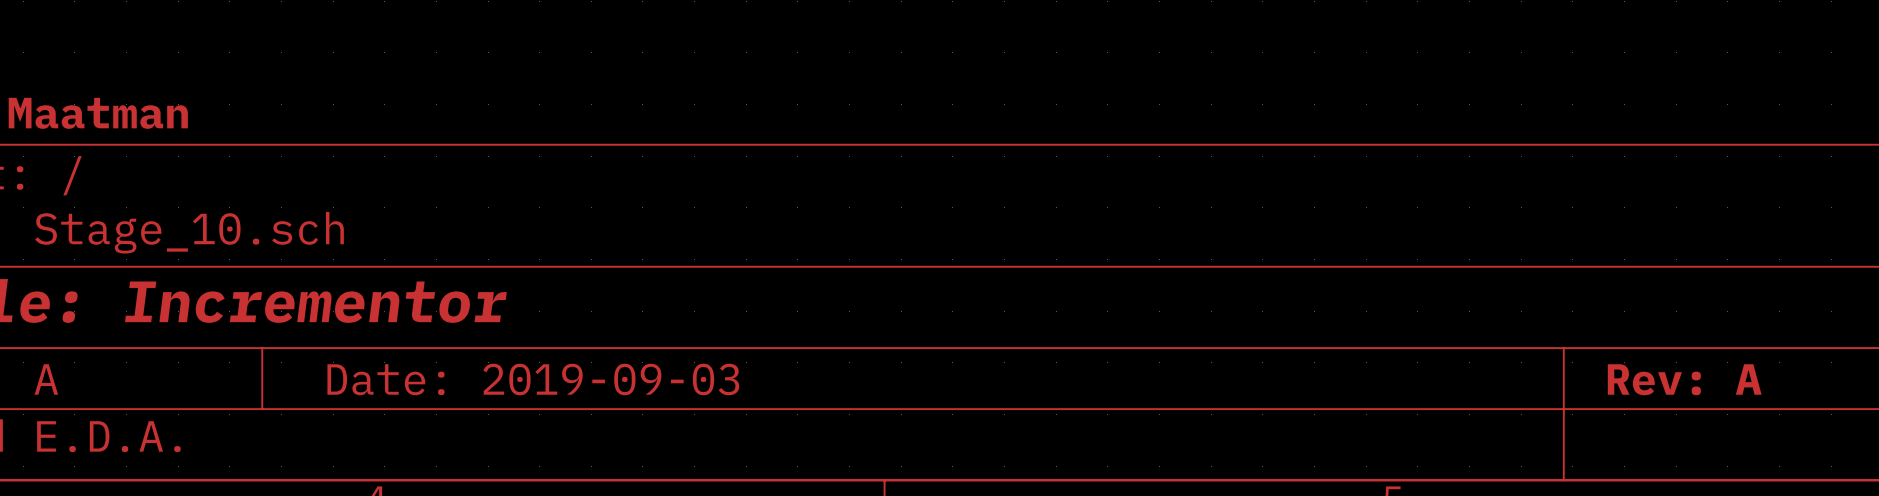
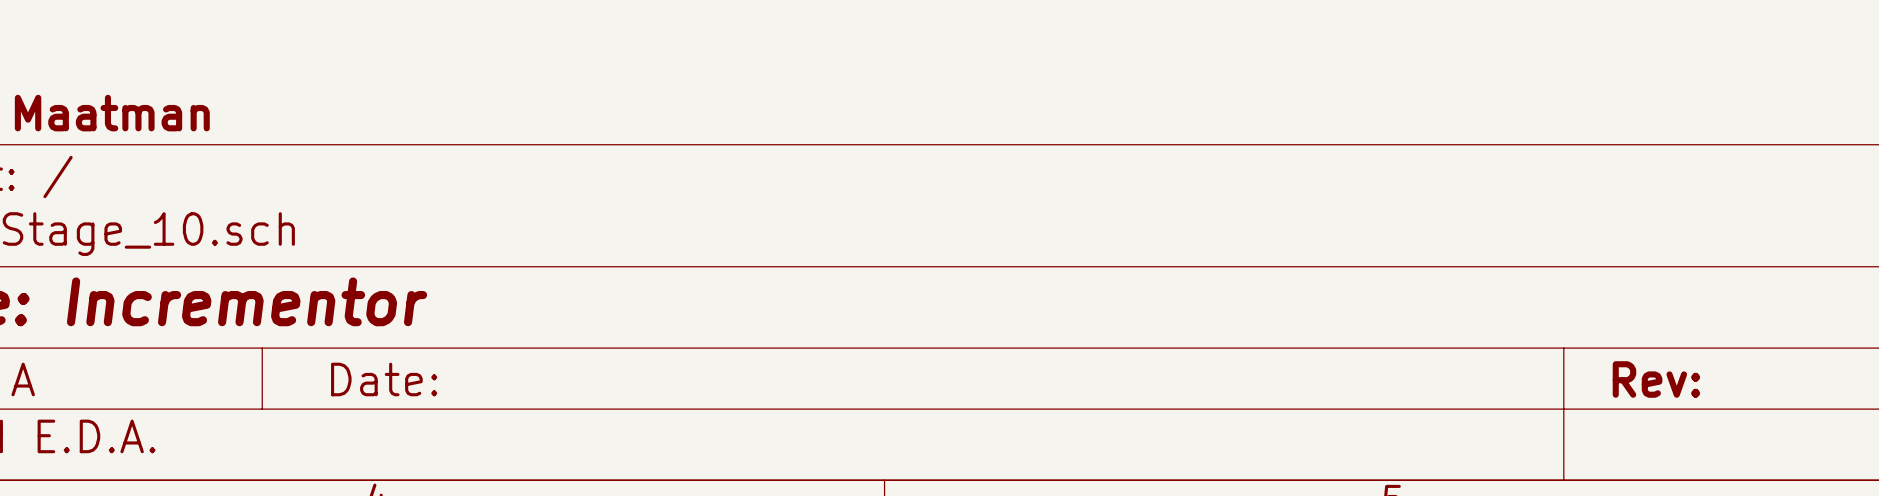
title block: Date: 2019-09-03 (533, 379) -> Date: (384, 379)
title block: Rev: A (1684, 379) -> Rev: (1656, 379)

